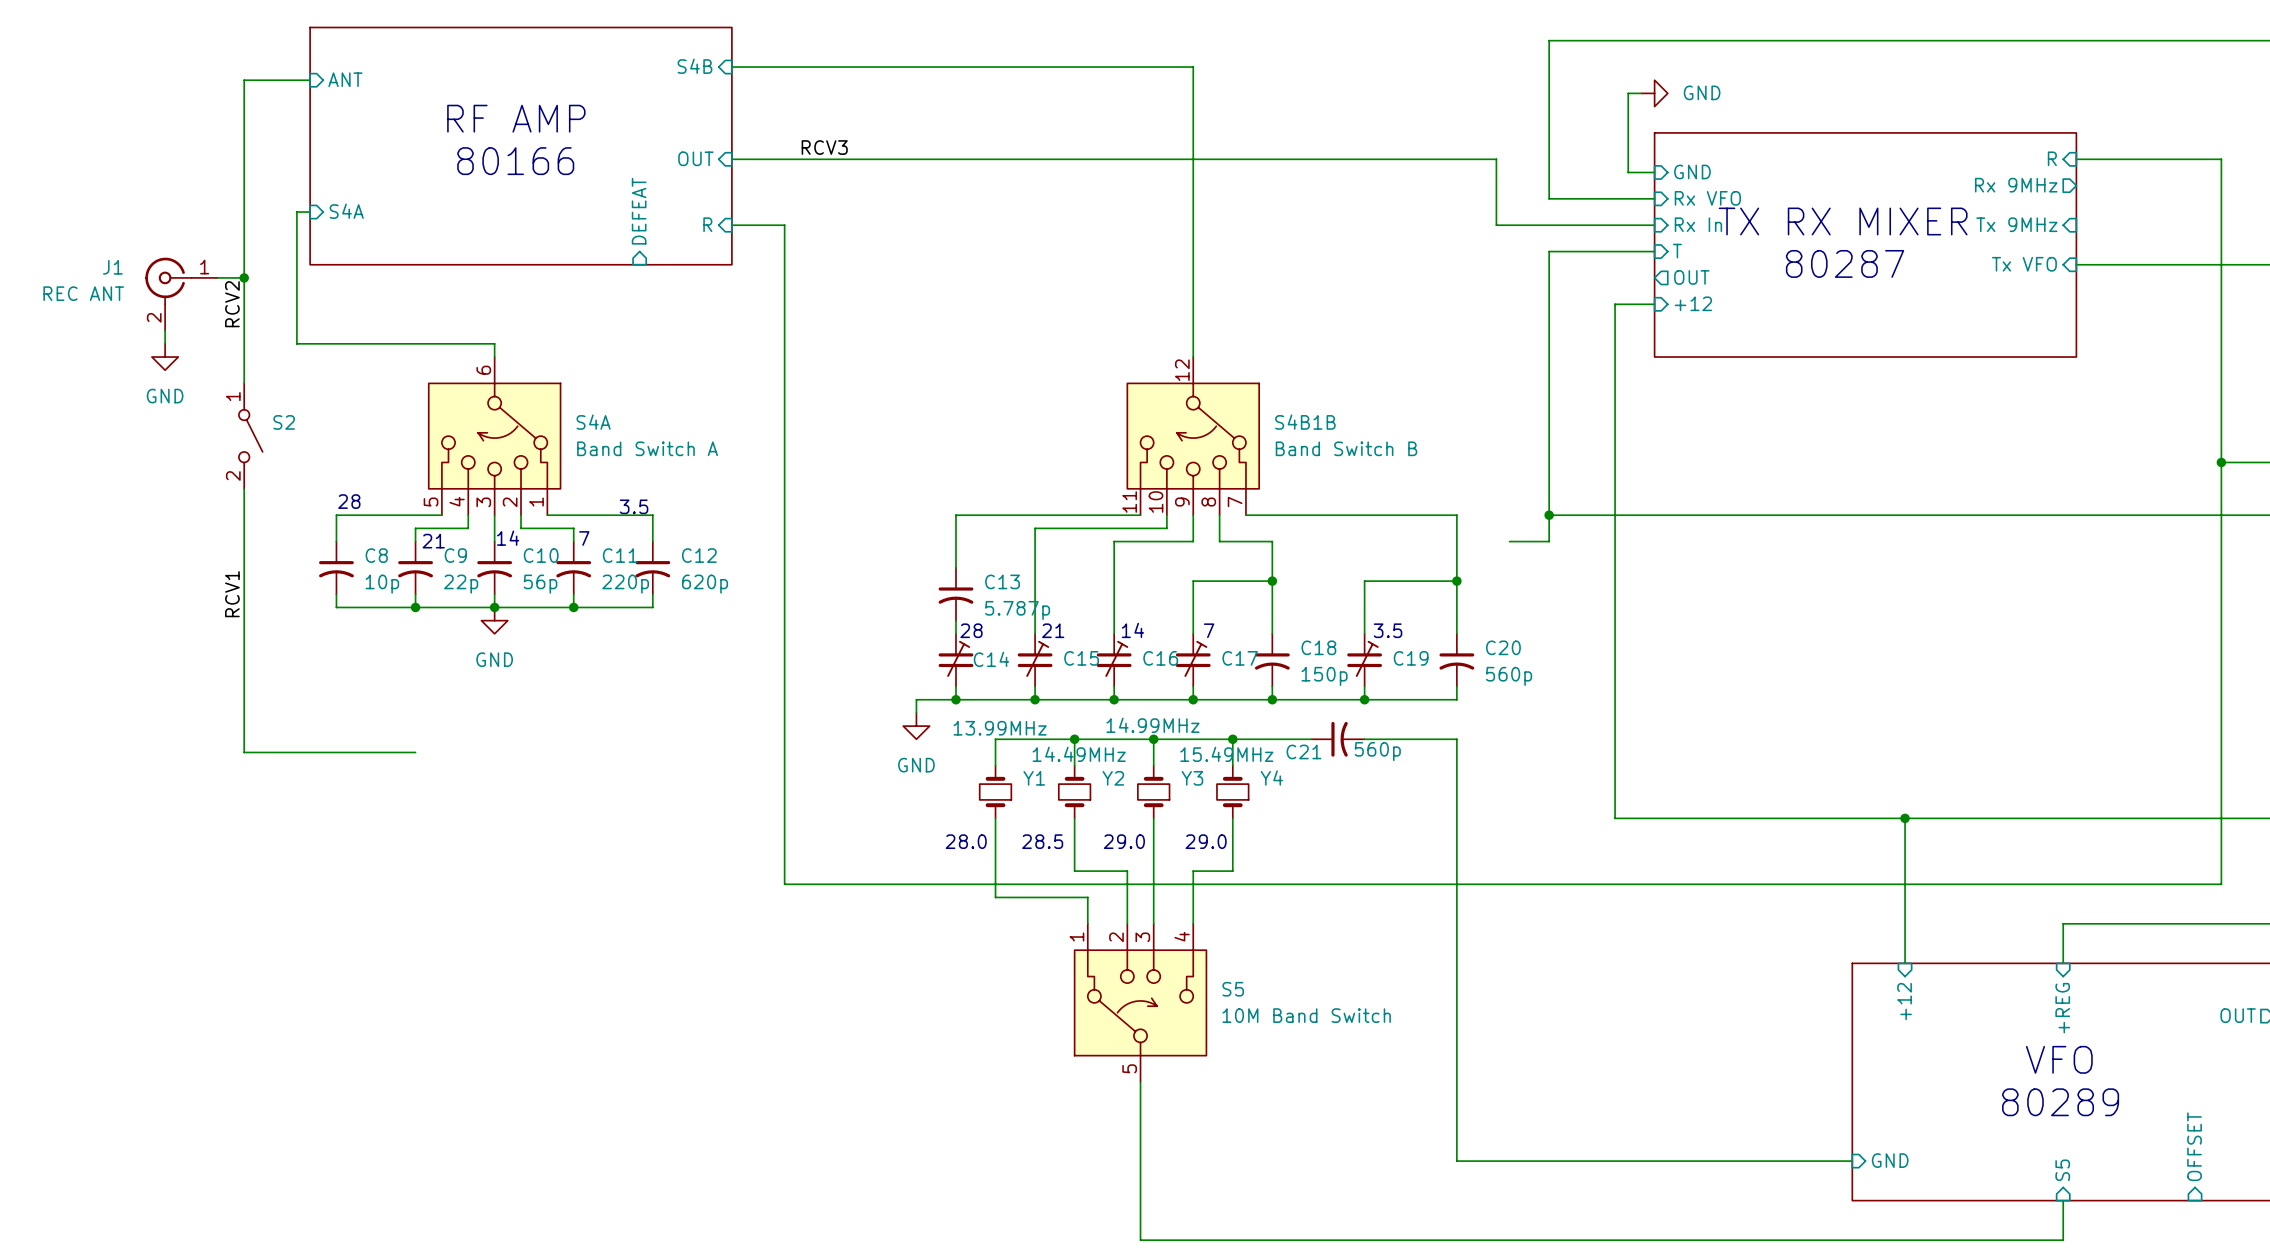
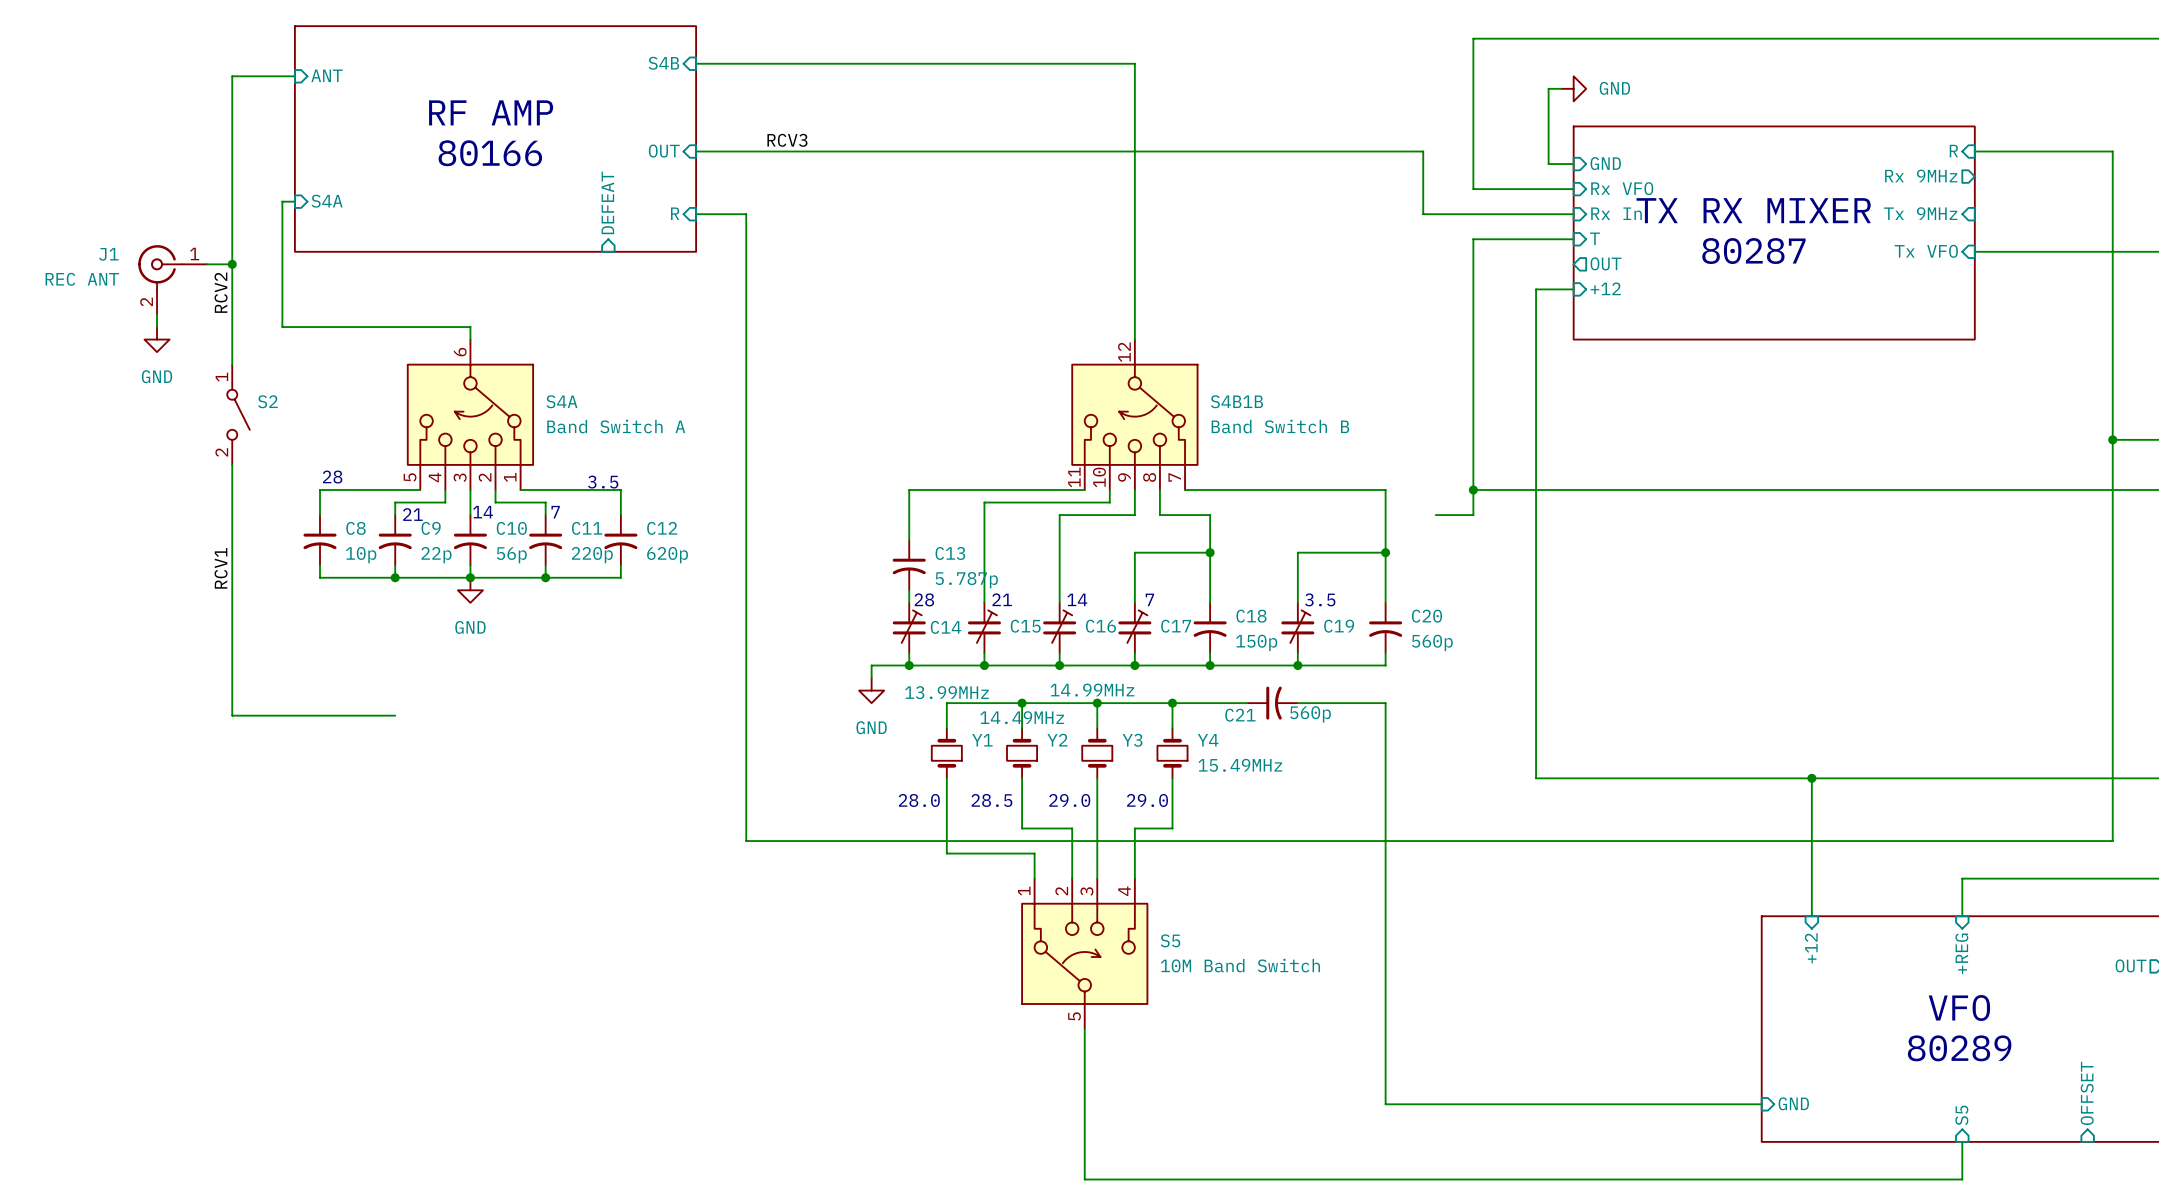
Y4 value position: 15.49MHz (1226, 754) -> 15.49MHz (1240, 765)

